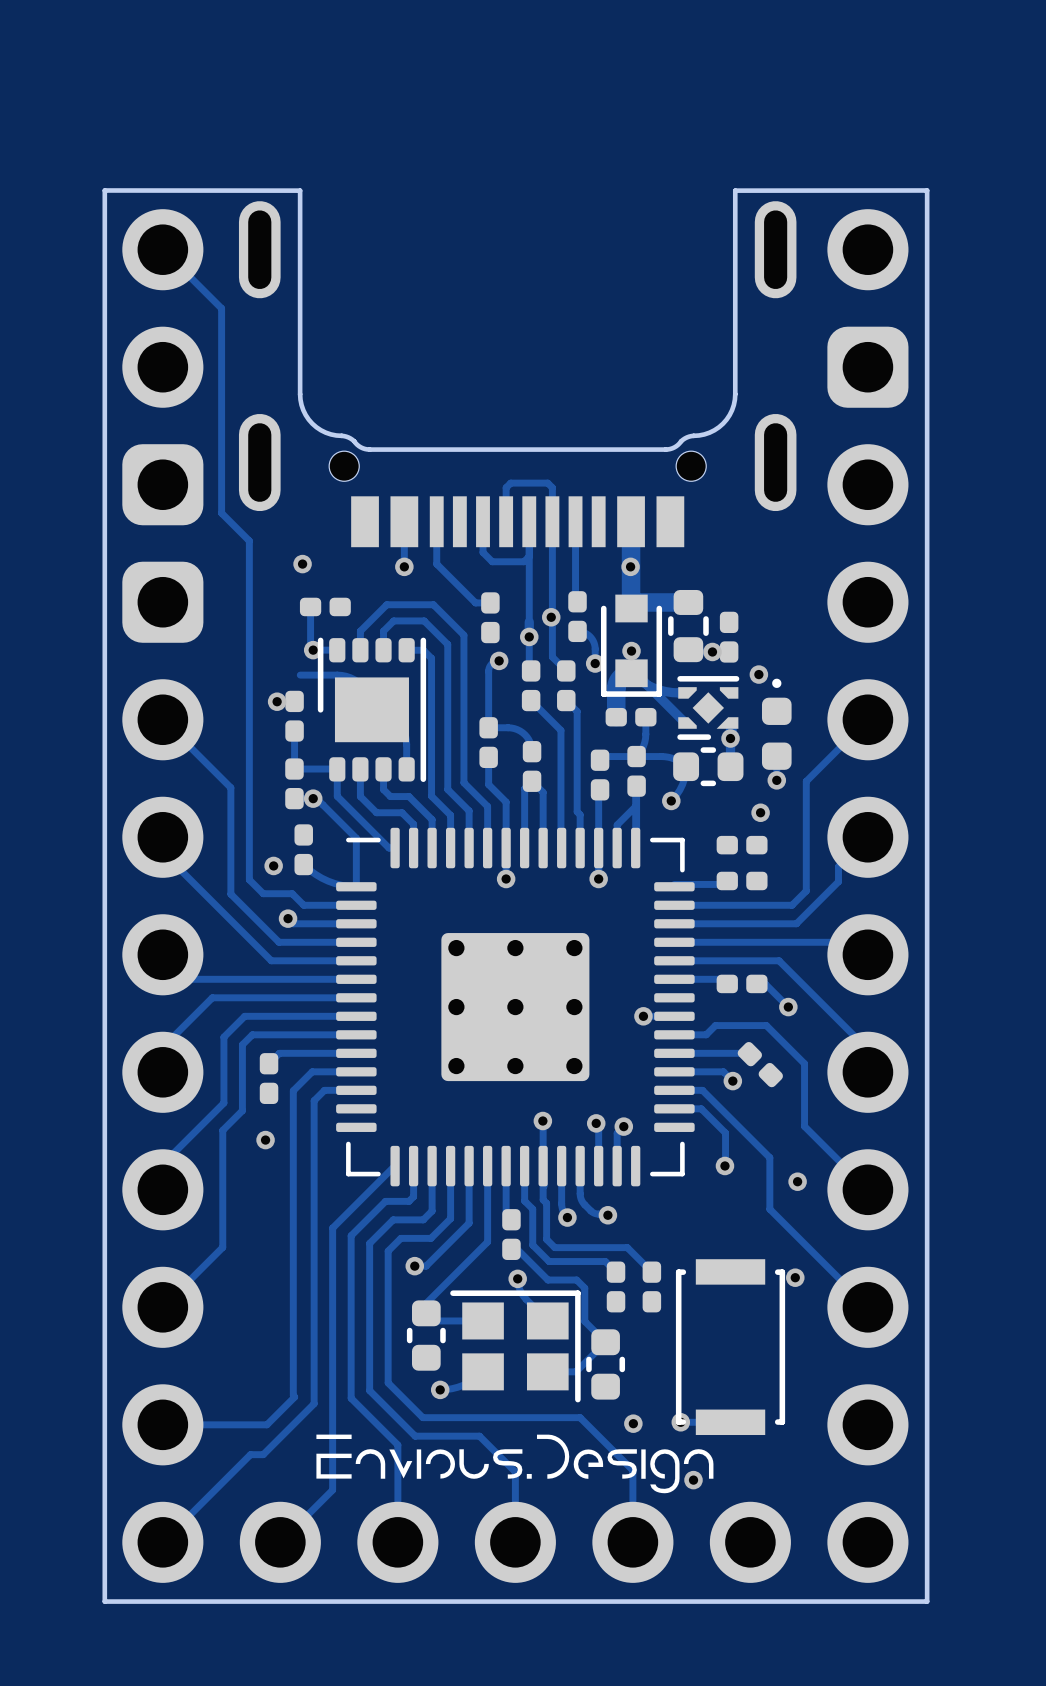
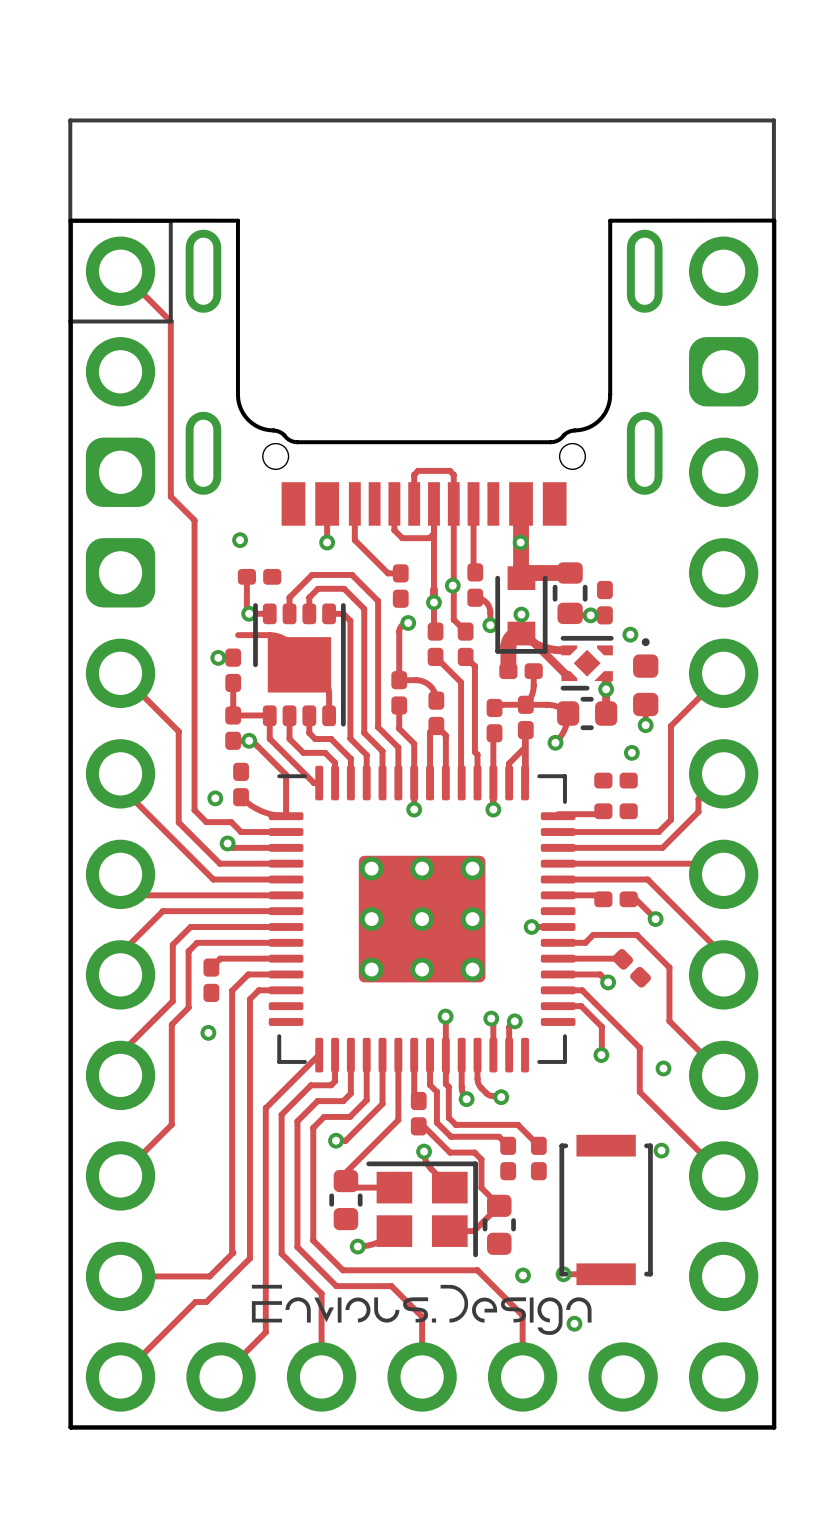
part: none -> (422, 773)

